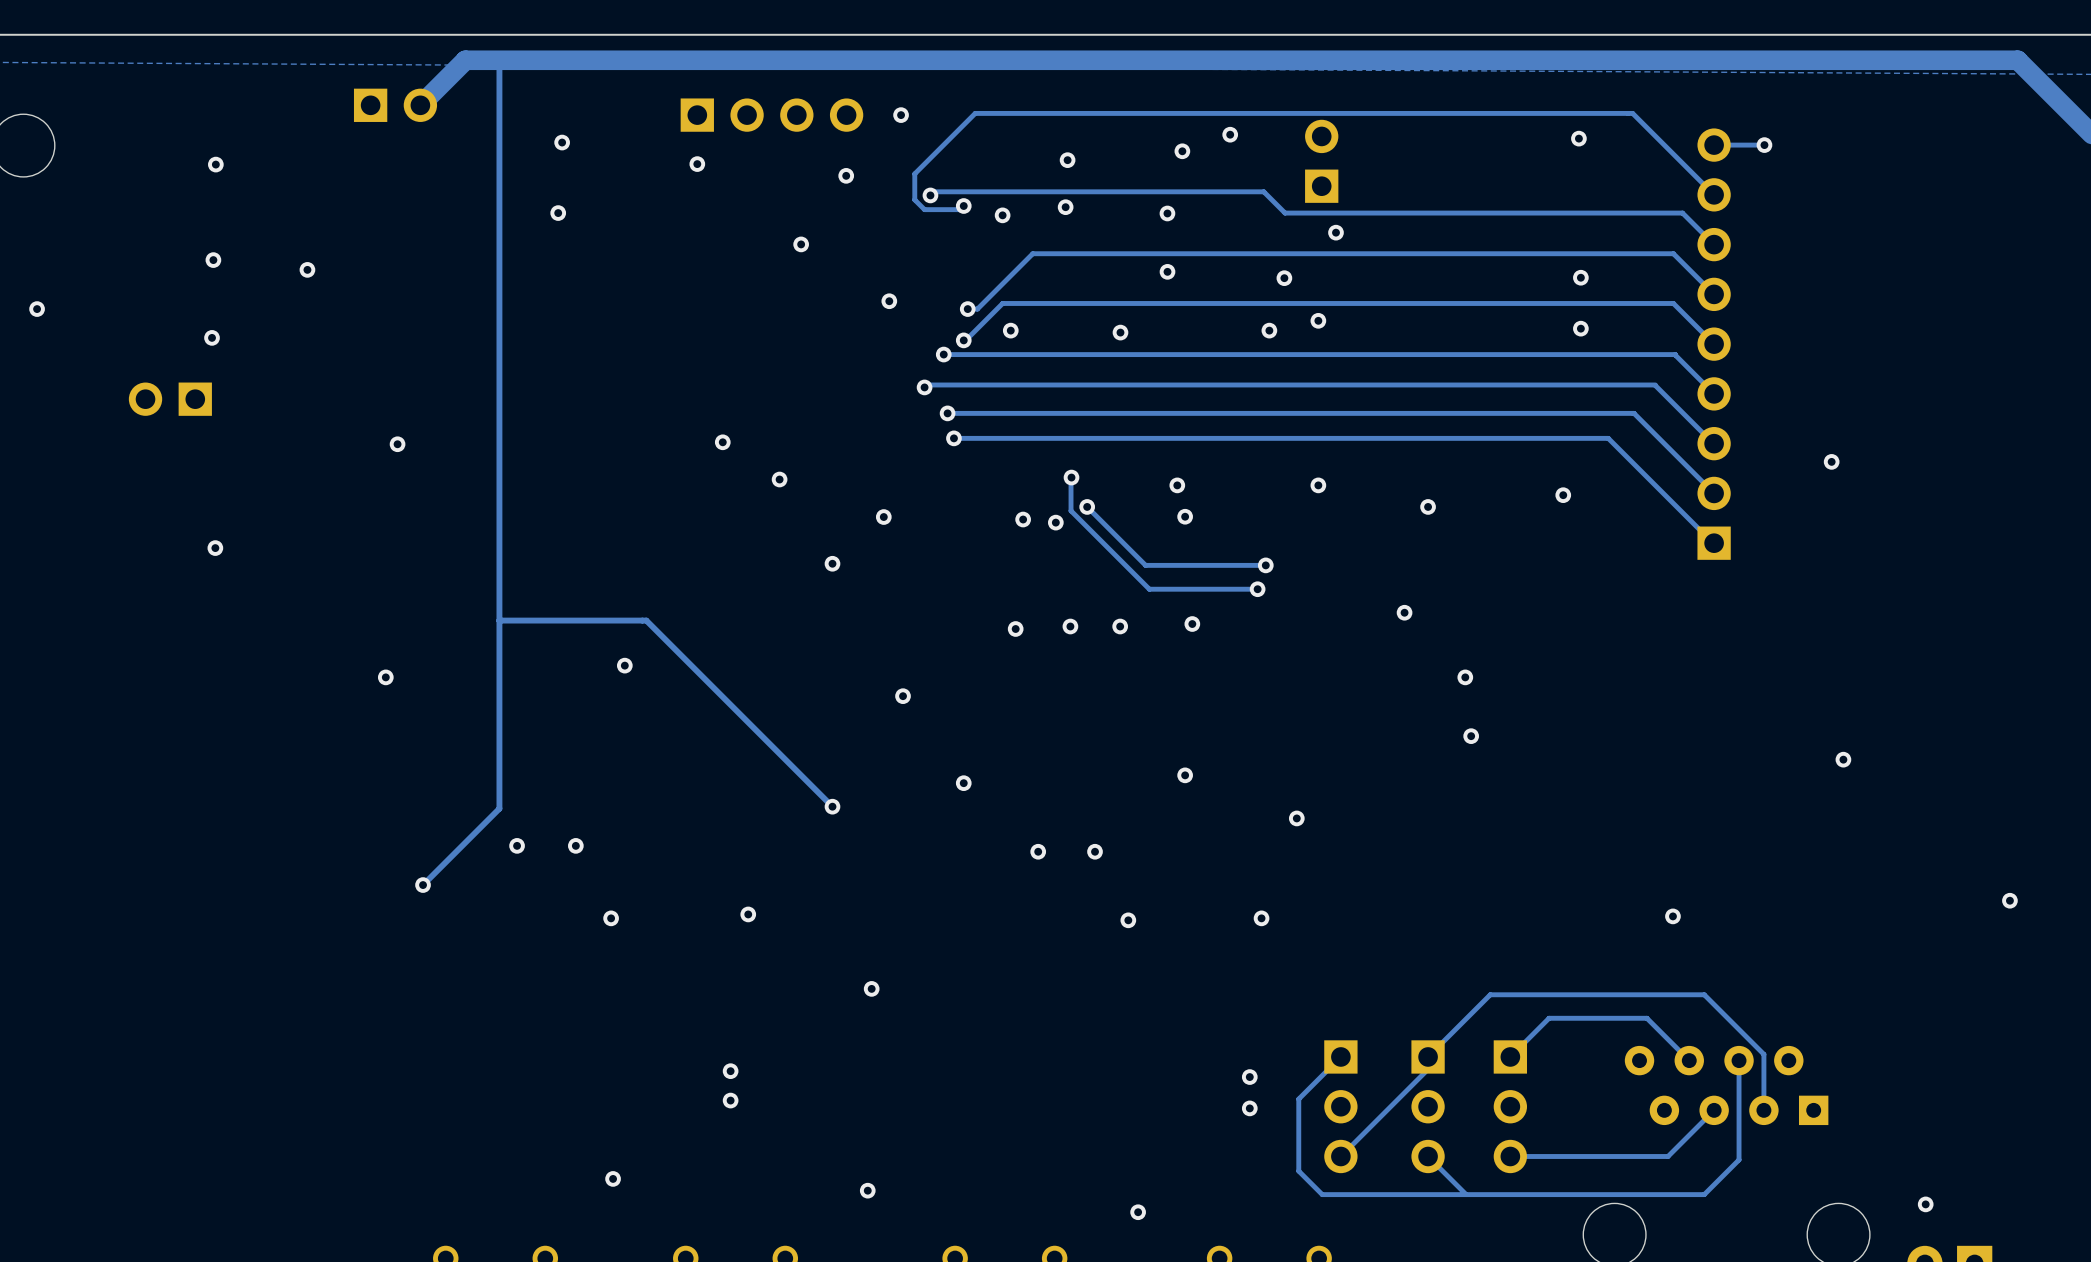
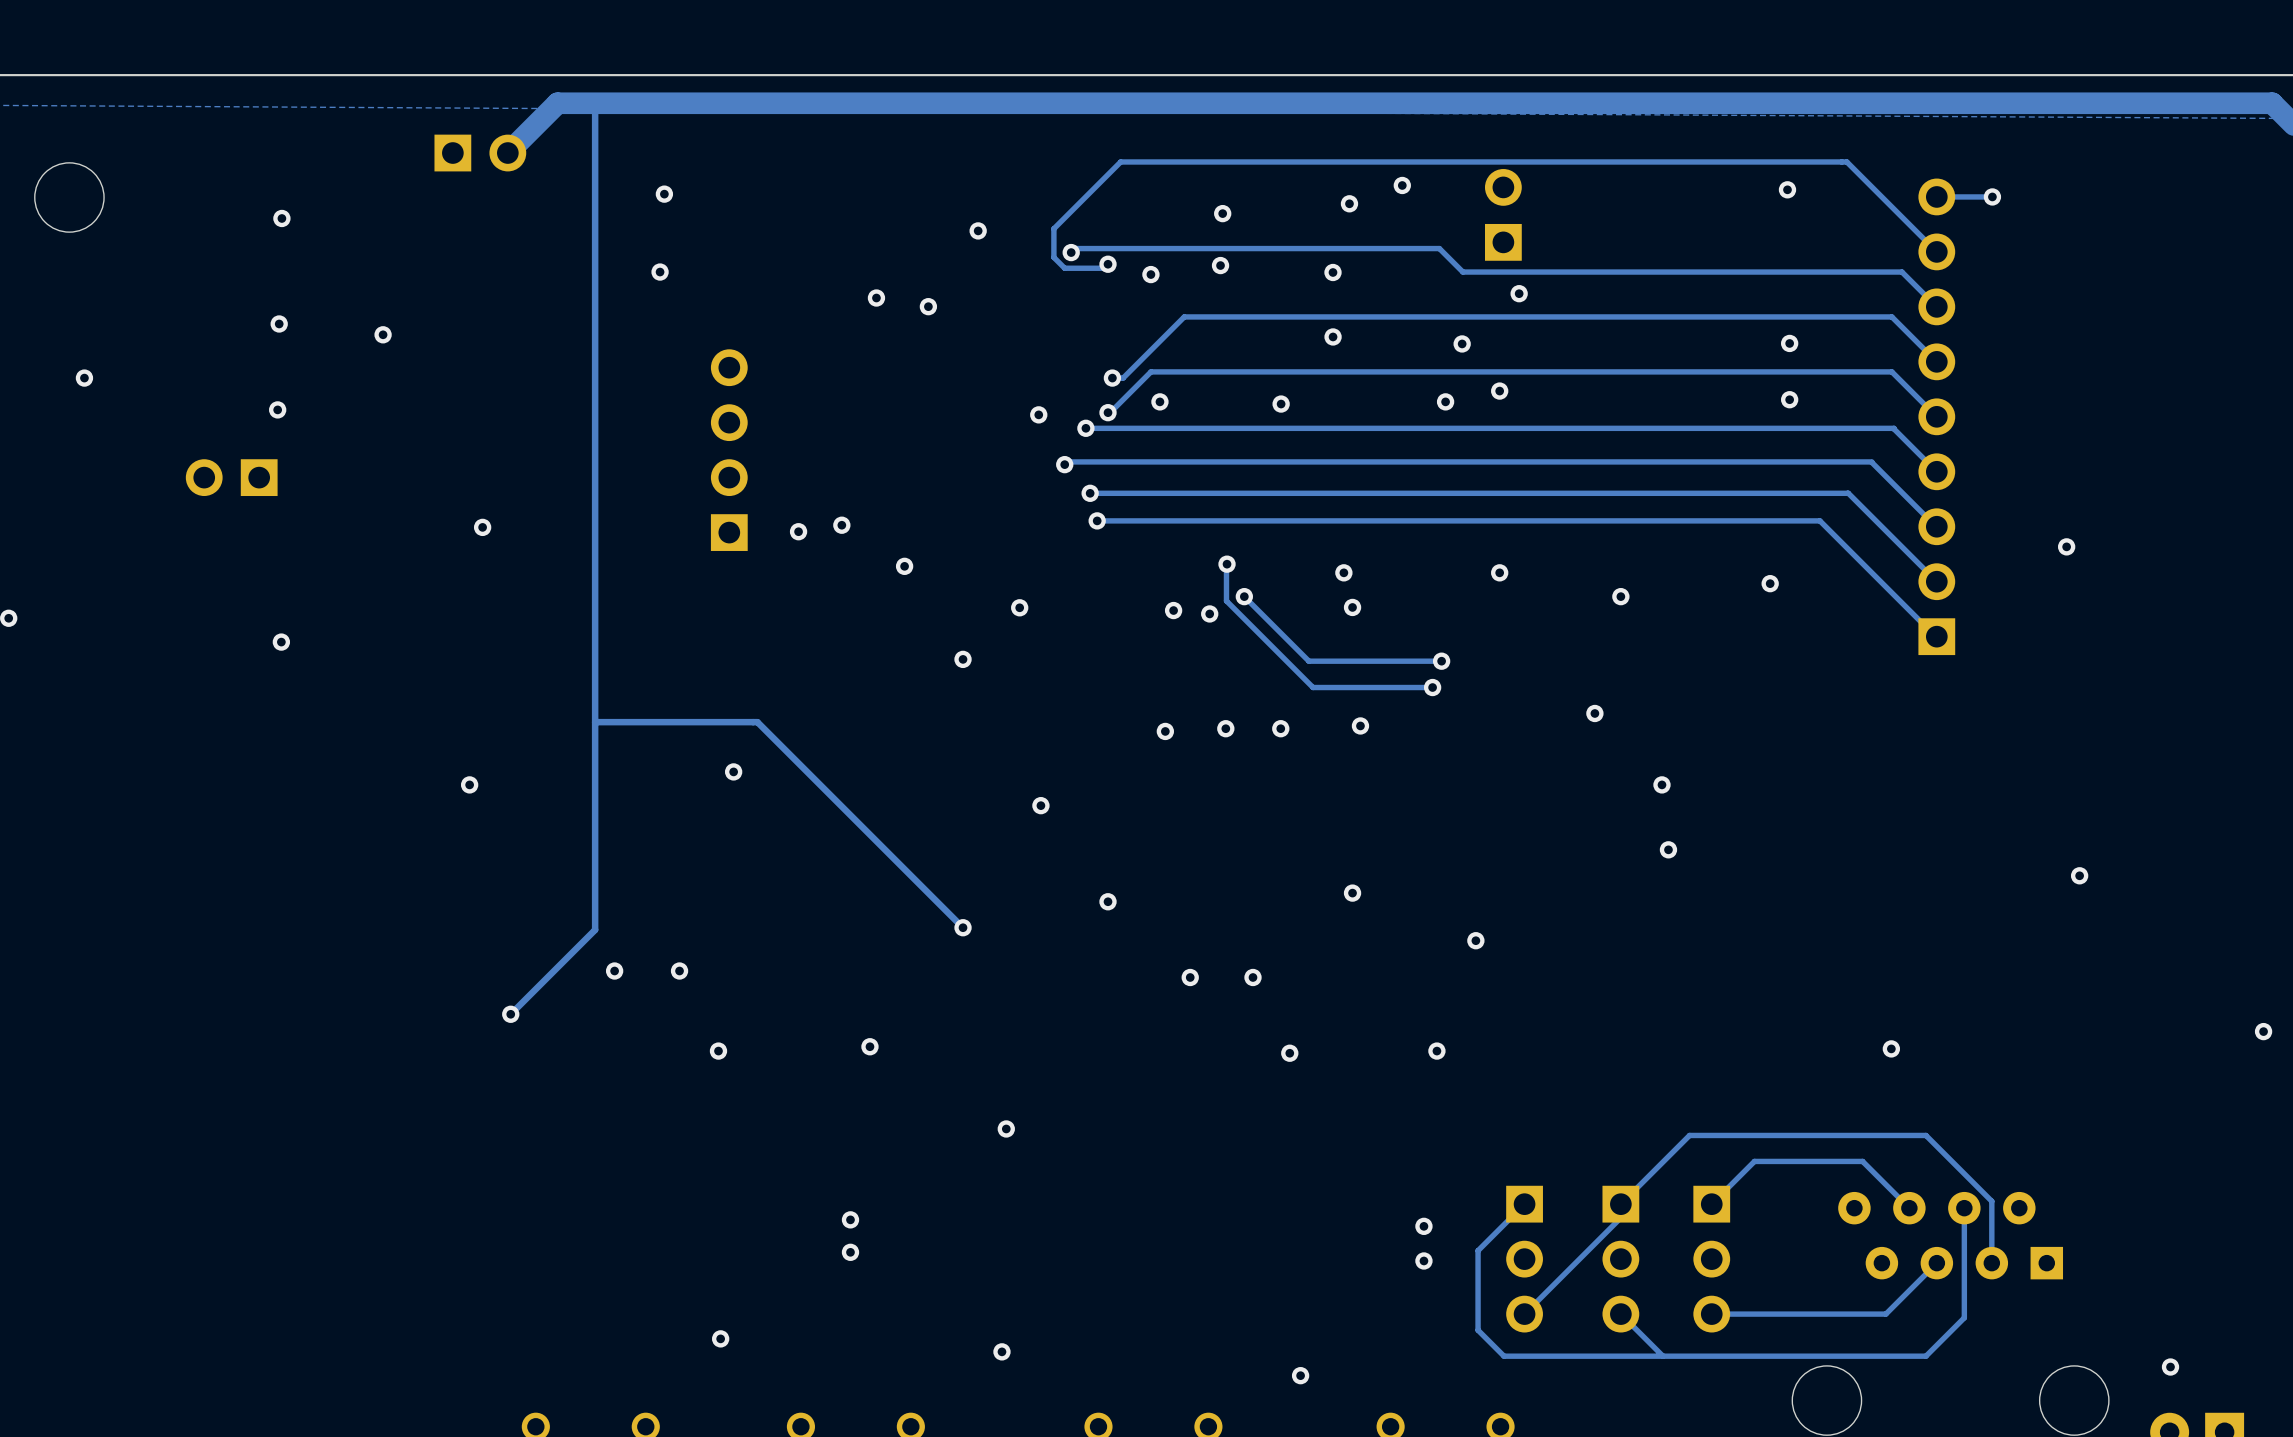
part rotation: 0° (771, 115) -> 90° counterclockwise (729, 450)
part position: (771, 115) -> (729, 450)
via: (901, 115) -> none
via: (697, 164) -> none
via: none -> (876, 298)
via position: (889, 301) -> (1038, 414)
via: none -> (798, 531)

